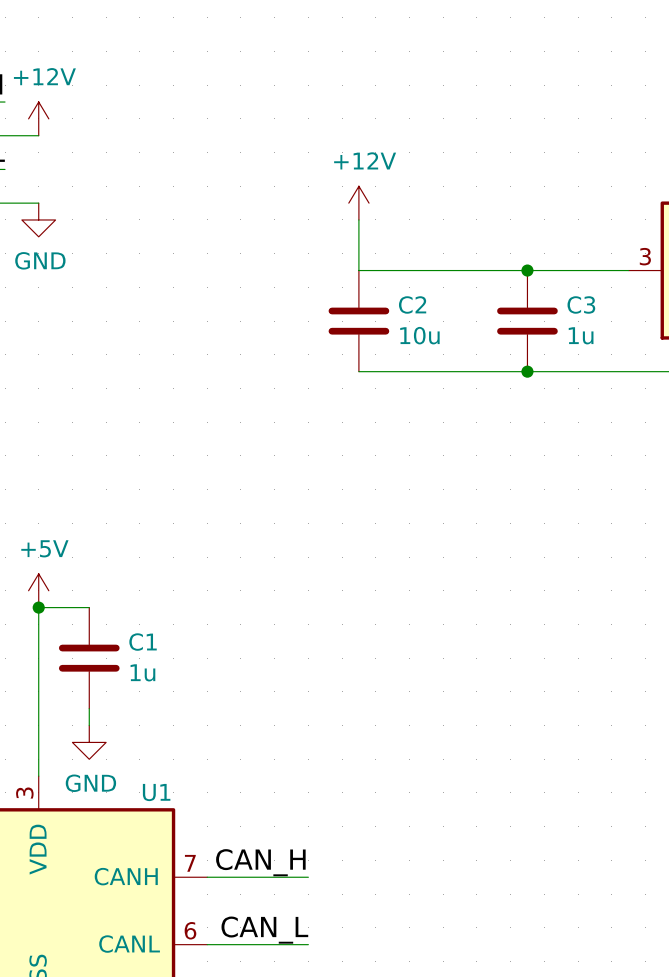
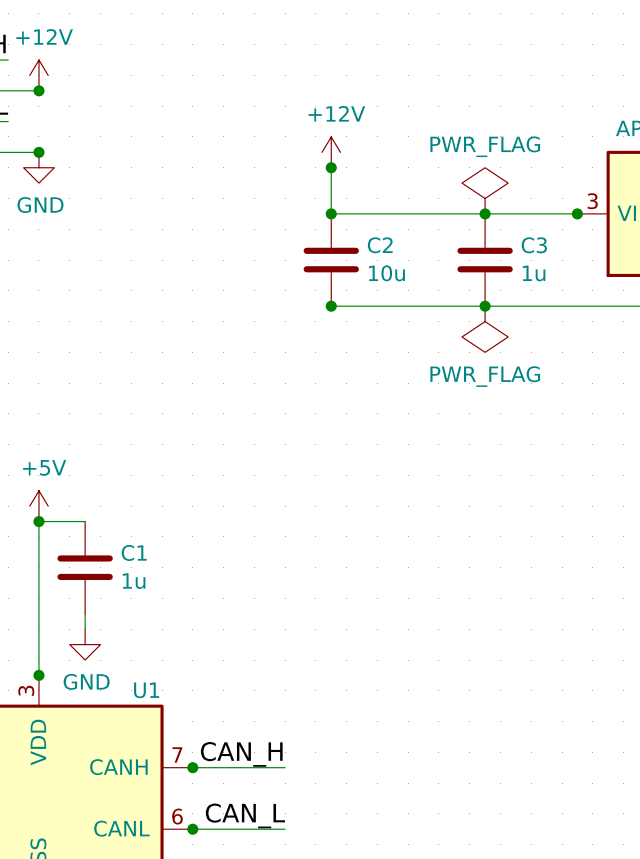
junction: none -> (38, 90)
junction: none -> (38, 152)
junction: none -> (331, 167)
power symbol: none -> PWR_FLAG (485, 190)
junction: none -> (331, 213)
junction: none -> (577, 213)
junction: none -> (331, 306)
power symbol: none -> PWR_FLAG (485, 329)
junction: none -> (38, 675)
junction: none -> (192, 767)
junction: none -> (192, 829)

